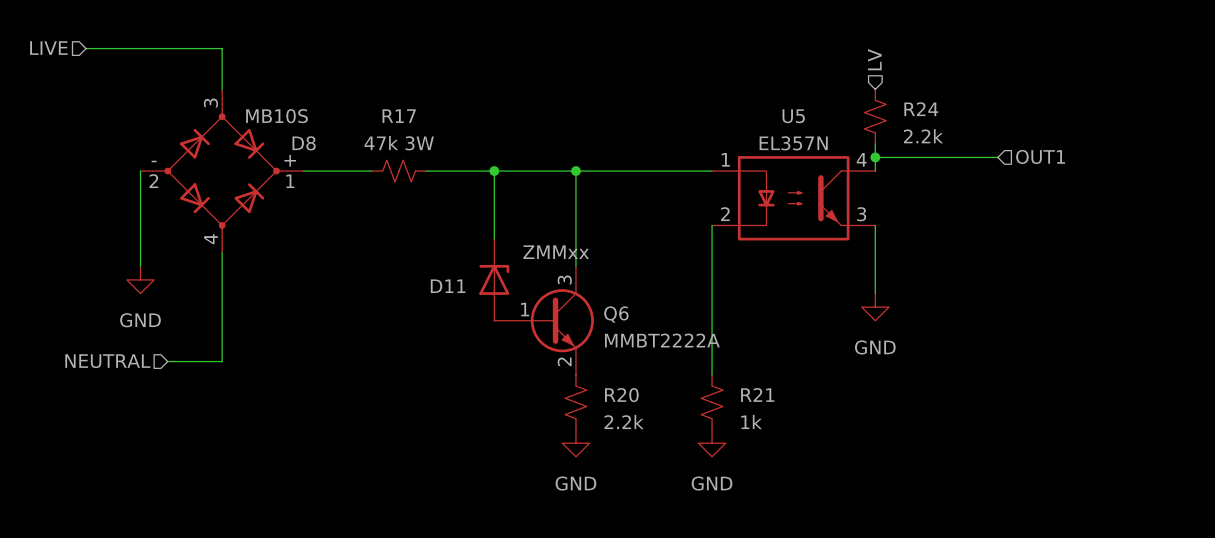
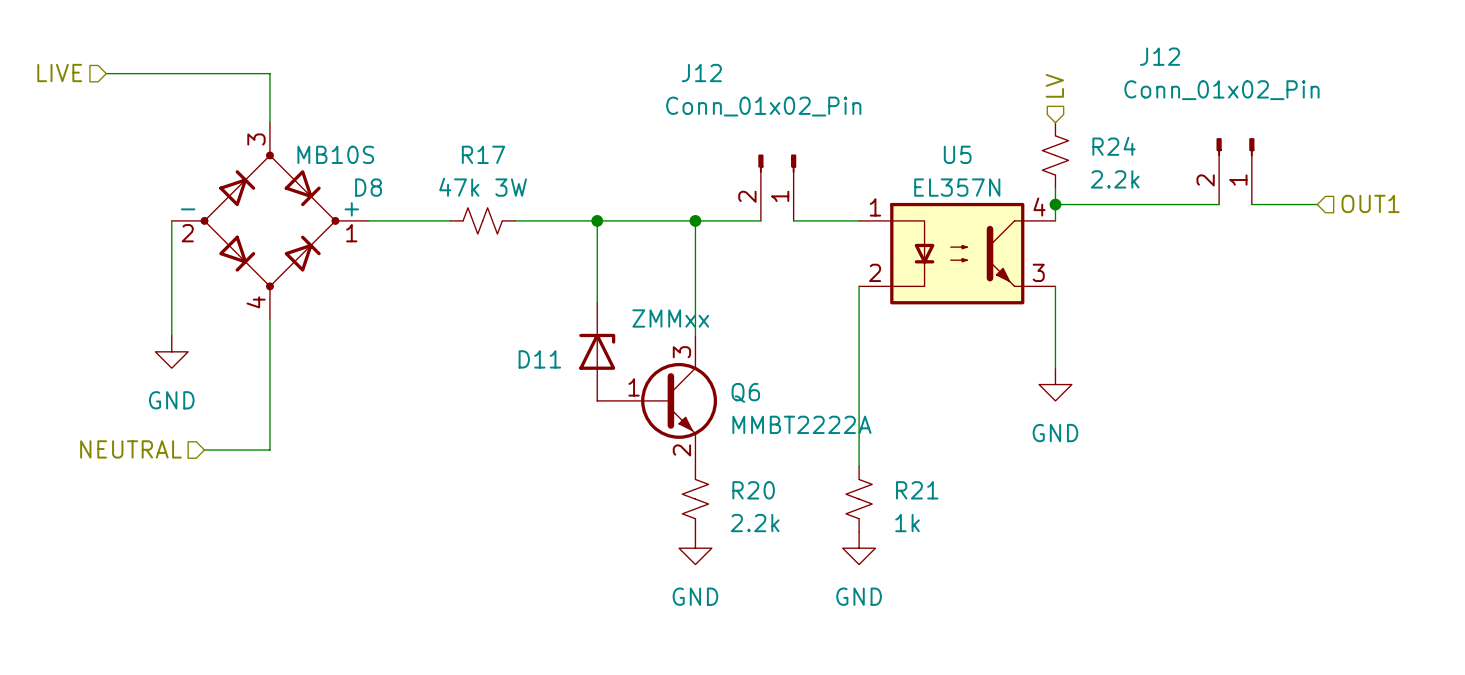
J12: none -> Conn_01x02_Pin (1235, 171)
J12: none -> Conn_01x02_Pin (777, 187)
hierarchical label position: OUT1 (1040, 156) -> OUT1 (1370, 203)
wire: none -> (1202, 204) (1219, 204)
wire: none -> (1251, 204) (1317, 204)
wire: (630, 171) (657, 171) -> none

